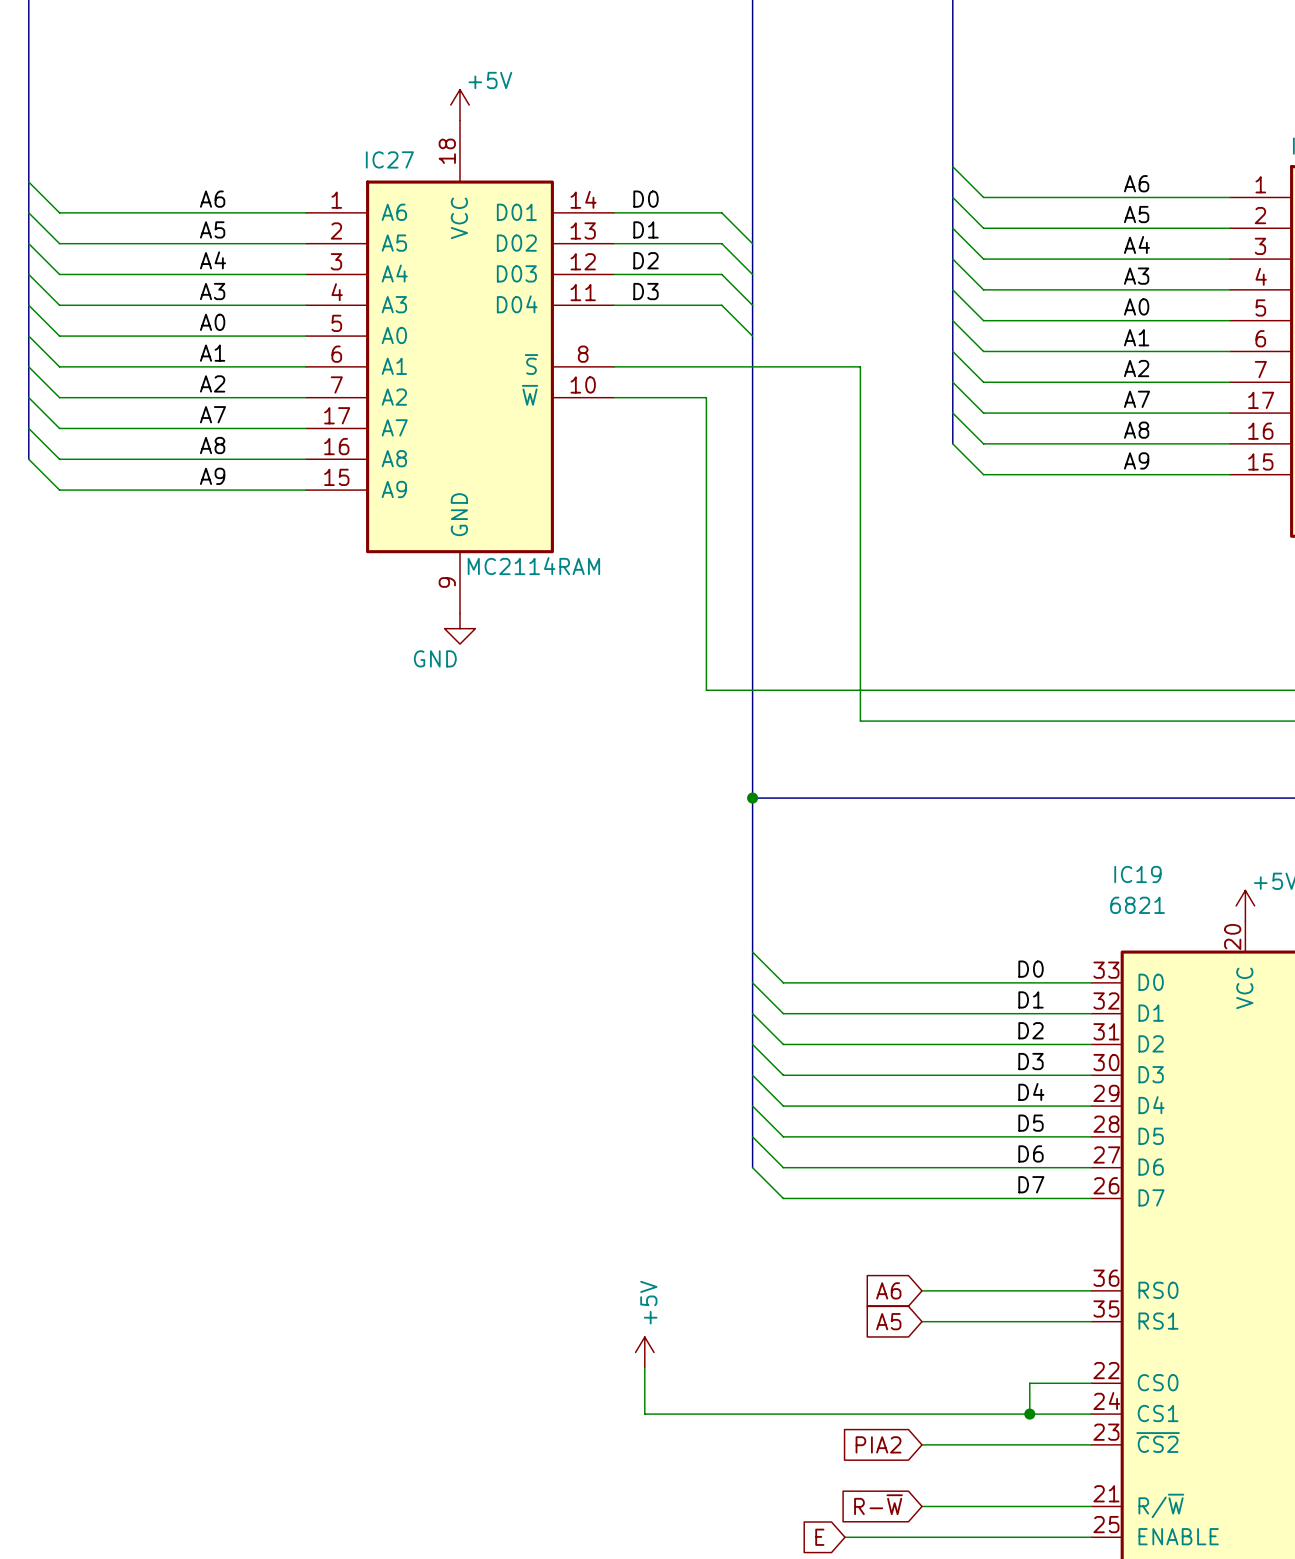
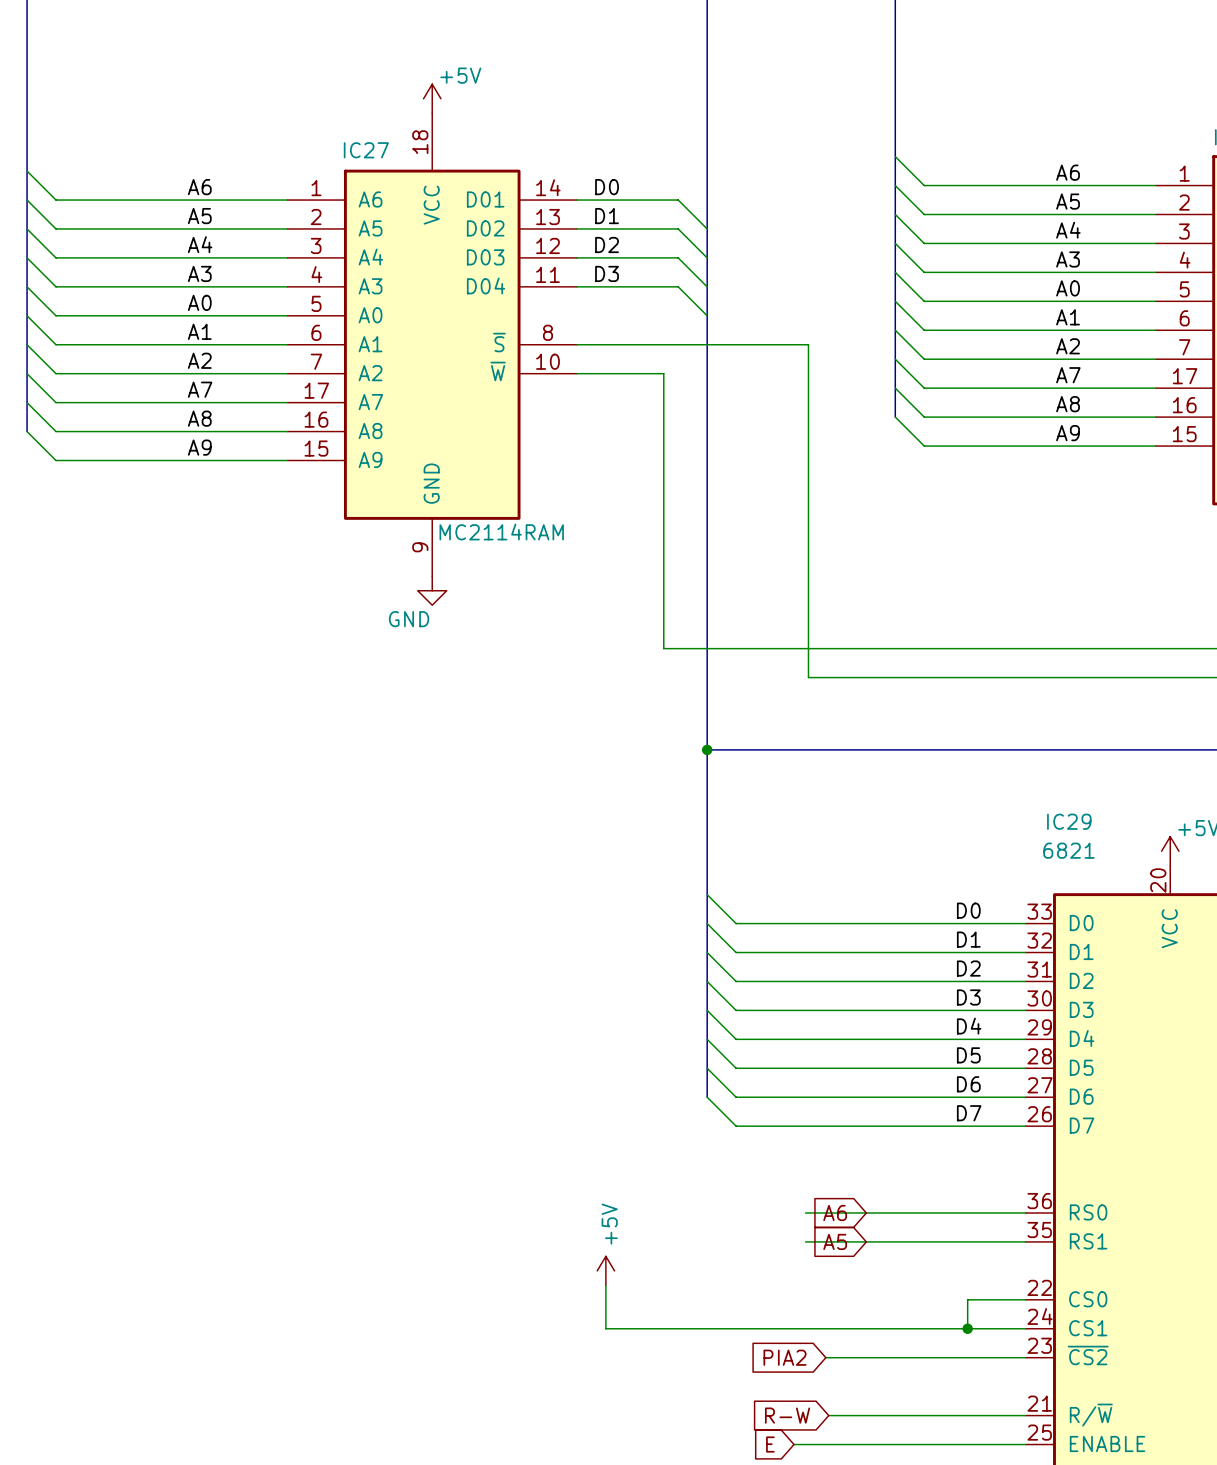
IC19 name: IC19 (1137, 874) -> IC29 (1069, 821)
wire: none -> (805, 1212) (866, 1212)
wire: none -> (805, 1241) (866, 1241)
wire: none -> (825, 1357) (866, 1357)
global label position: PIA2 (878, 1444) -> PIA2 (784, 1357)
global label: R-~{W} (878, 1504) -> R-W (787, 1415)
wire: none -> (828, 1415) (866, 1415)

